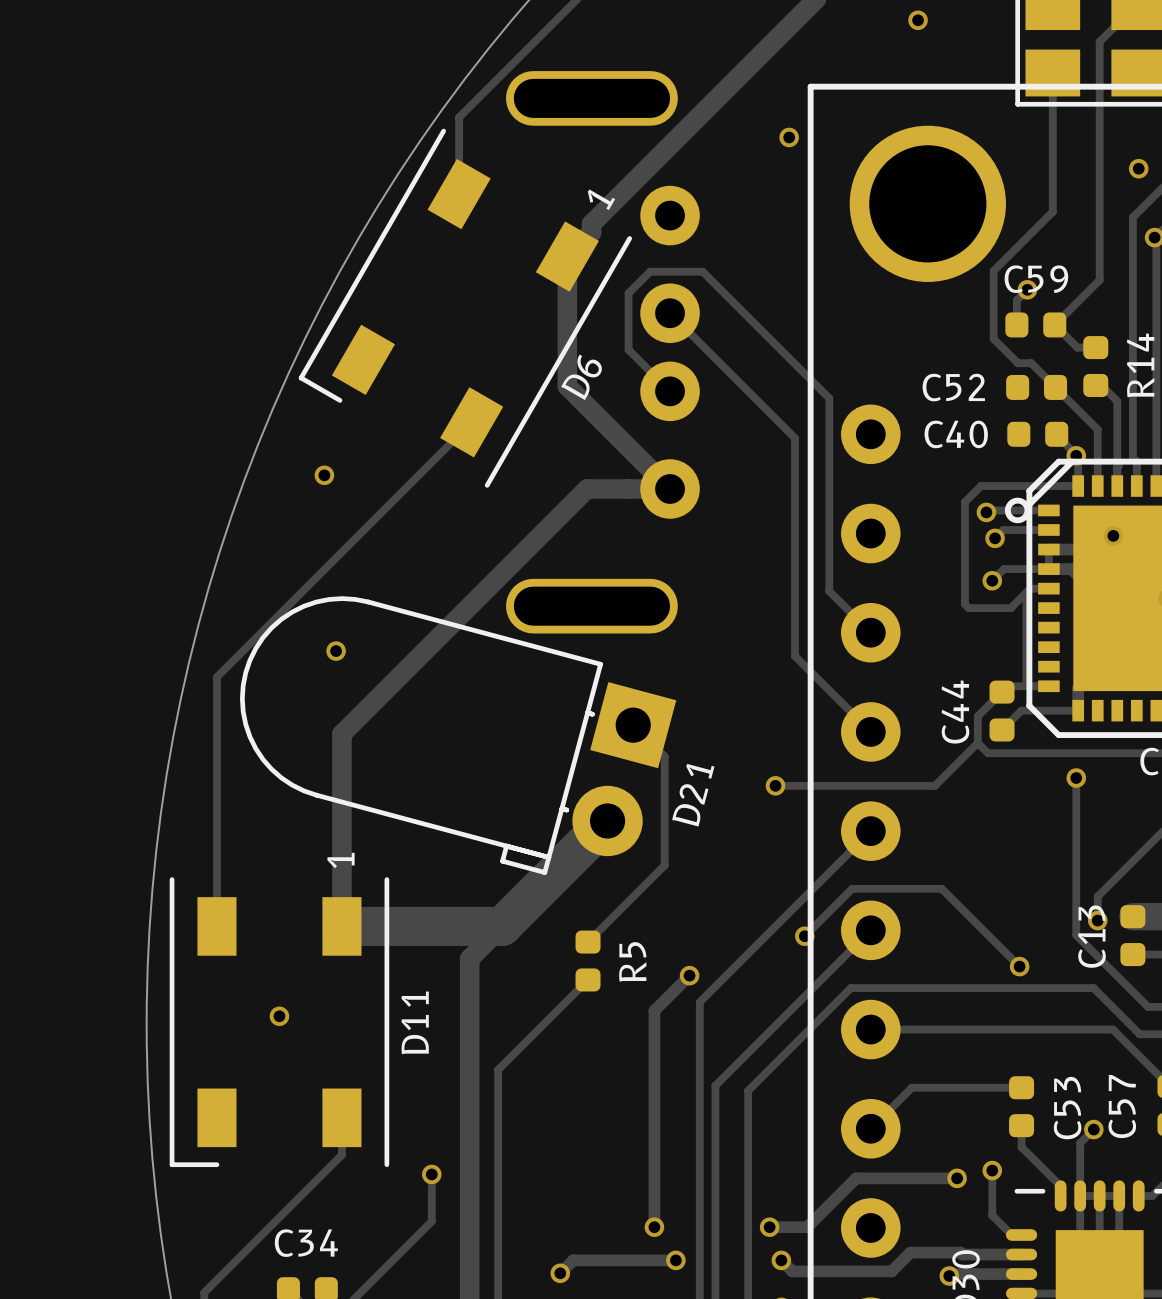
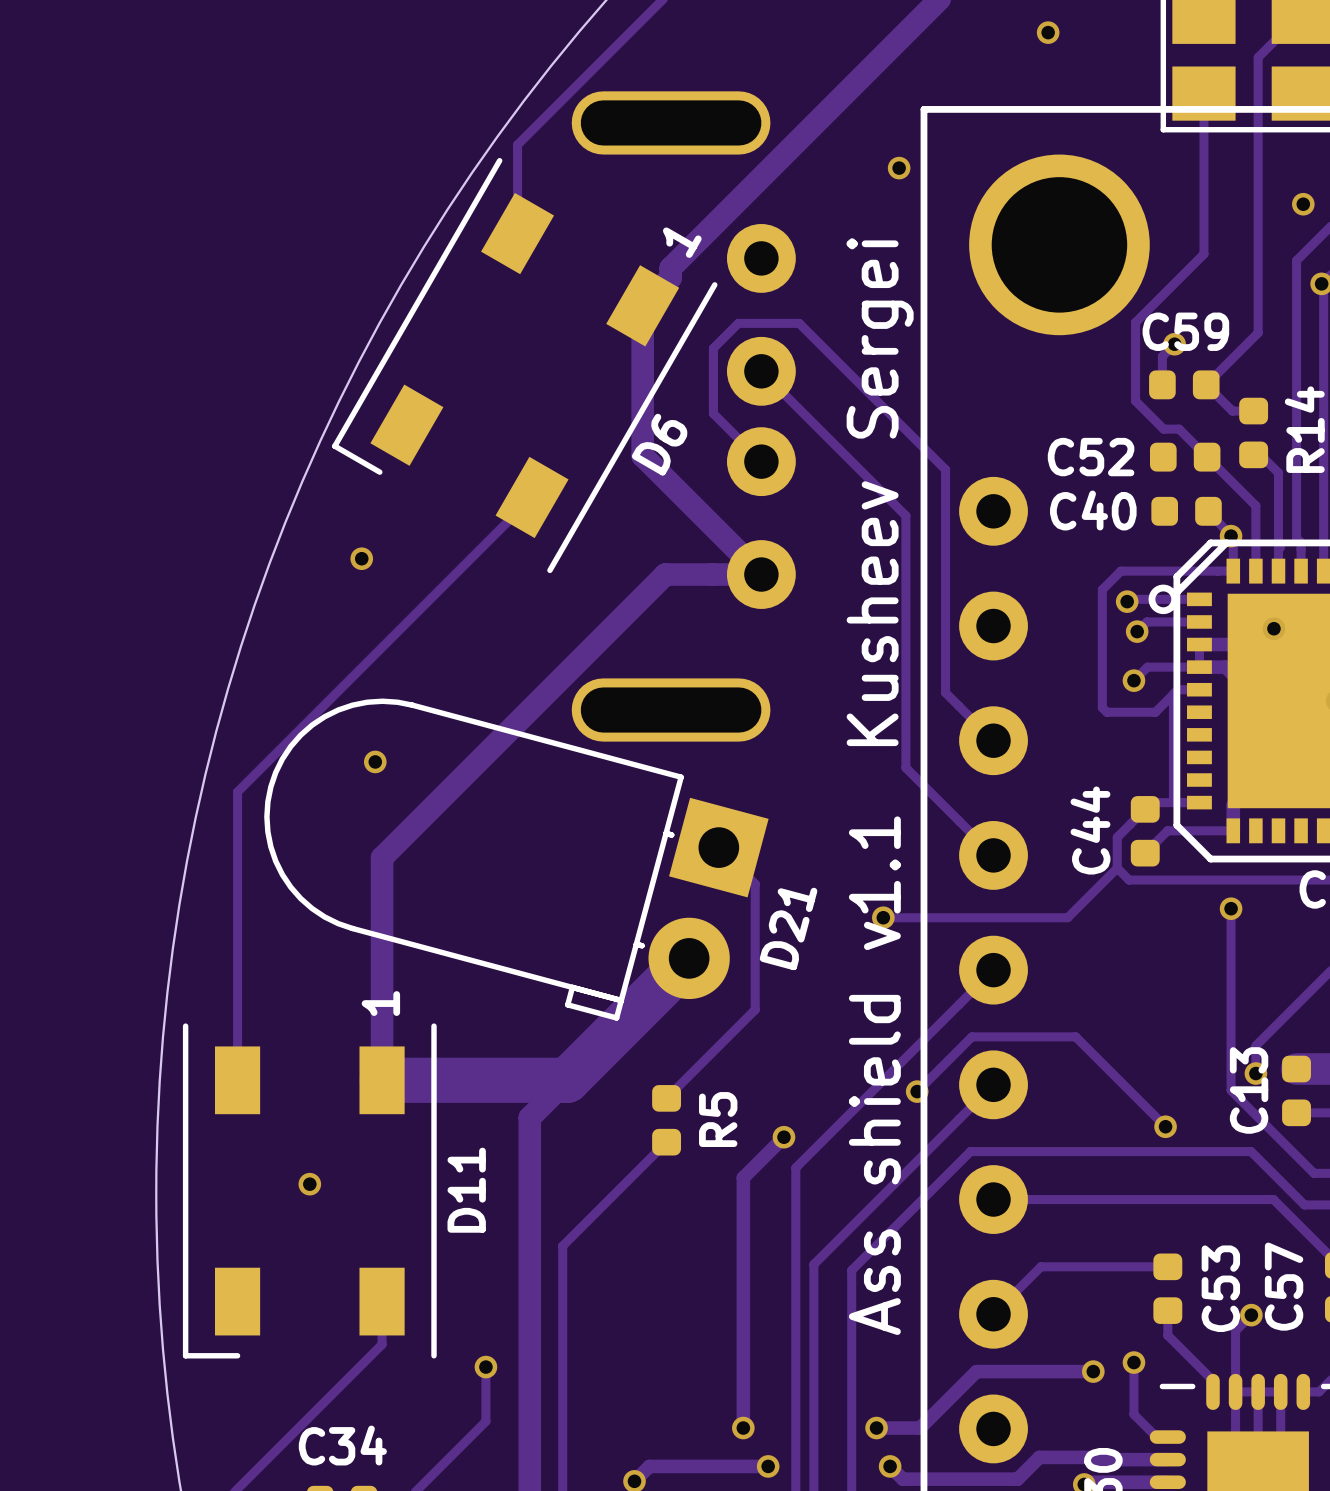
text: none -> Kusheev Sergei (880, 492)
text: none -> Ass shield v1.1 (874, 1075)

